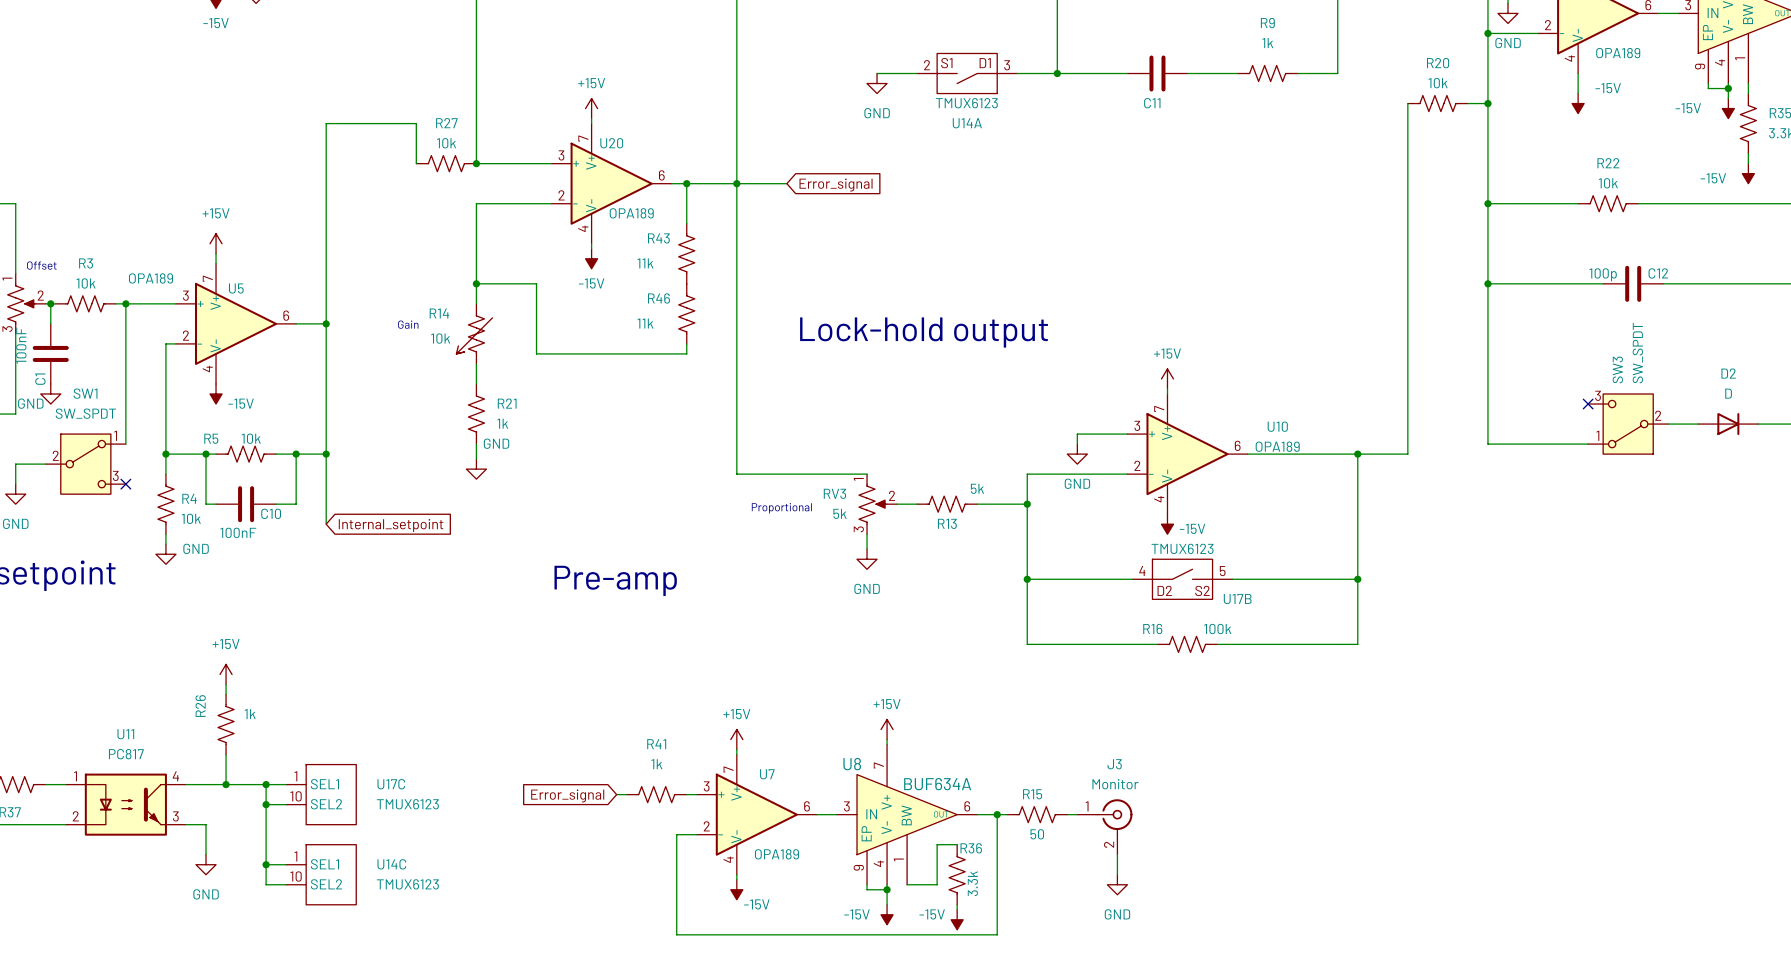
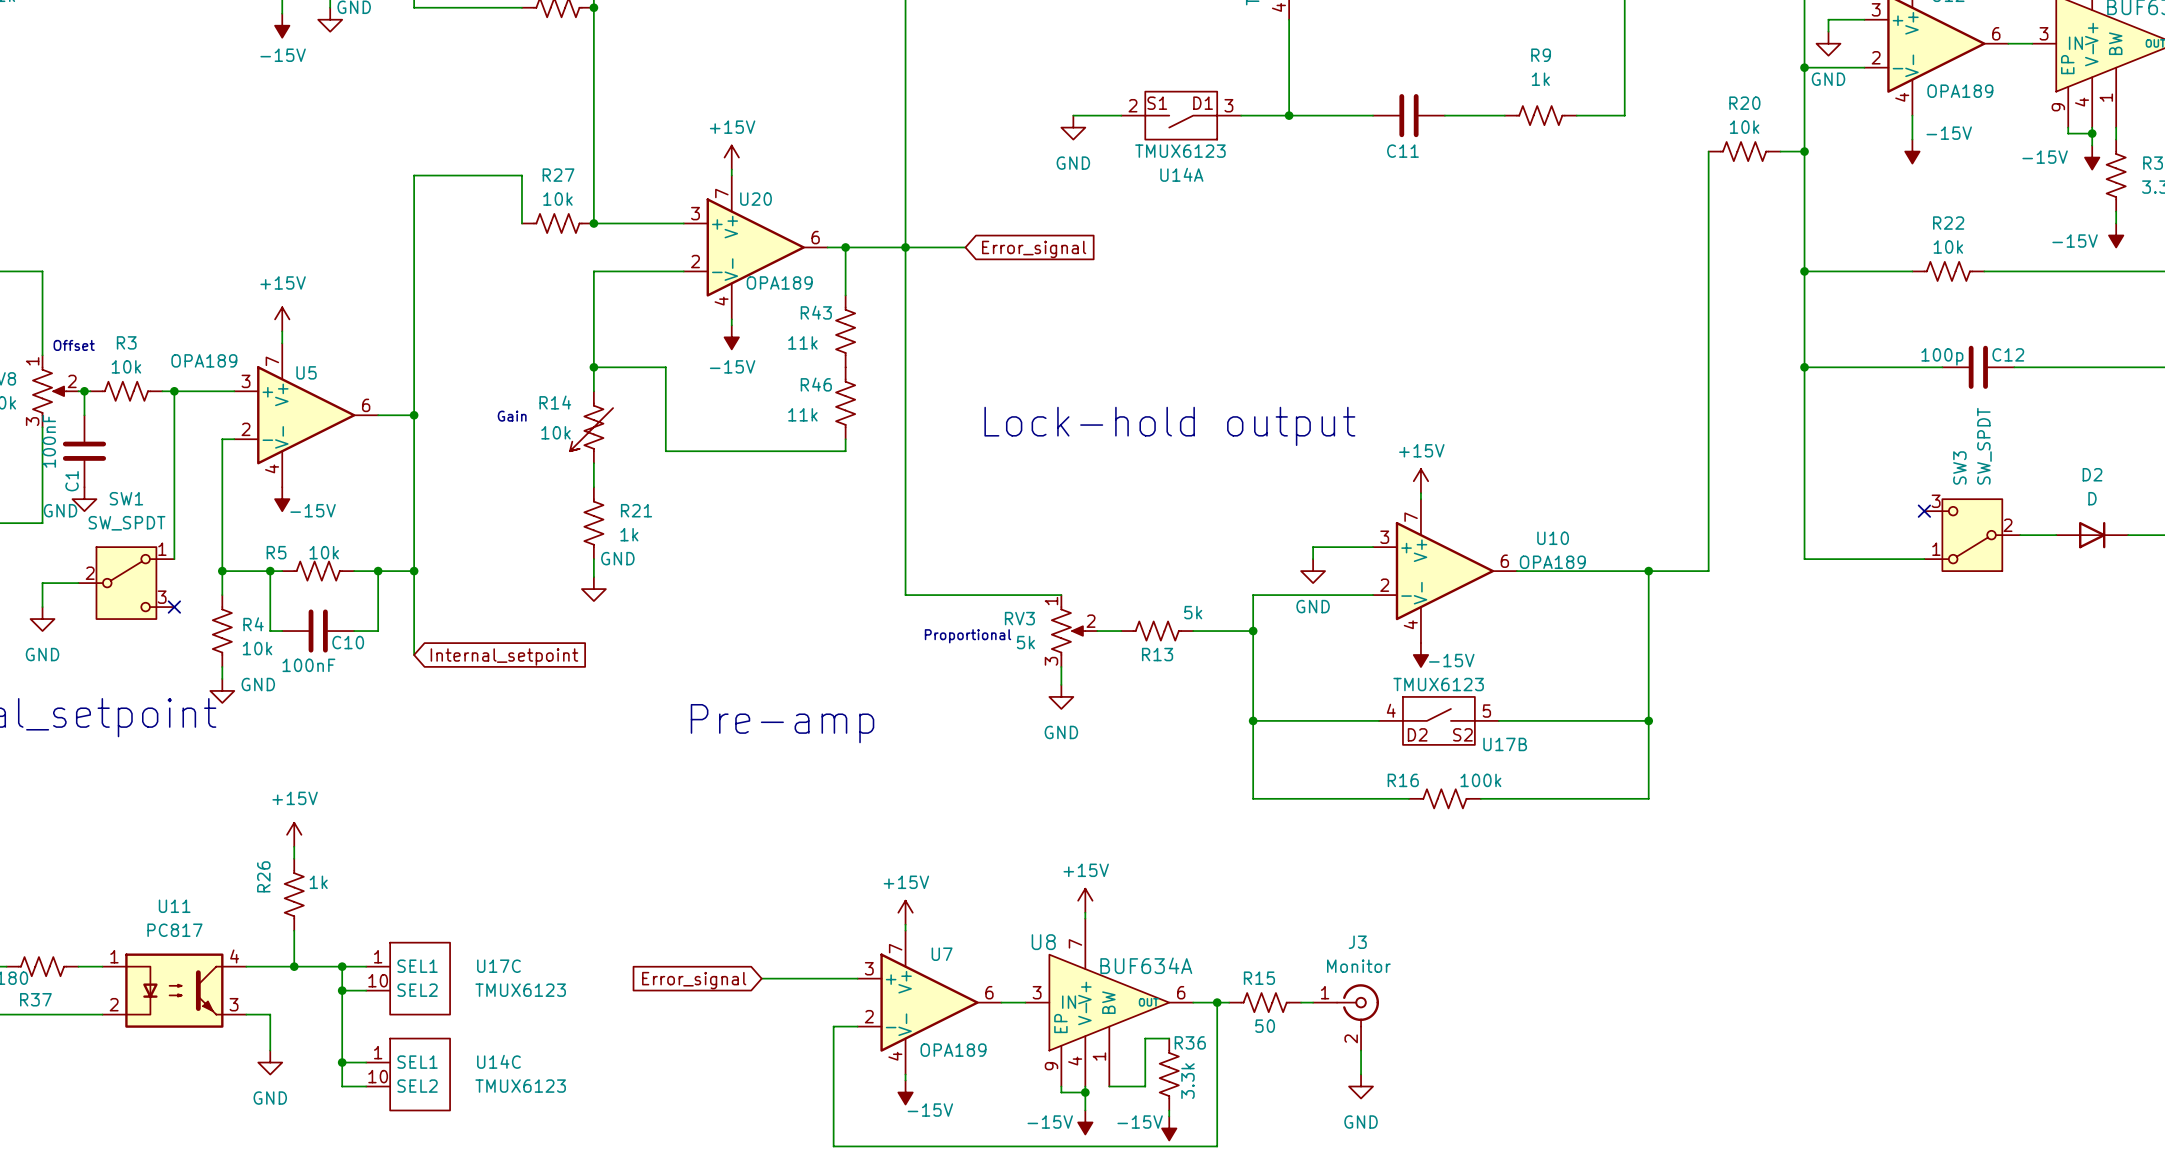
R41: 1k (656, 794) -> none

